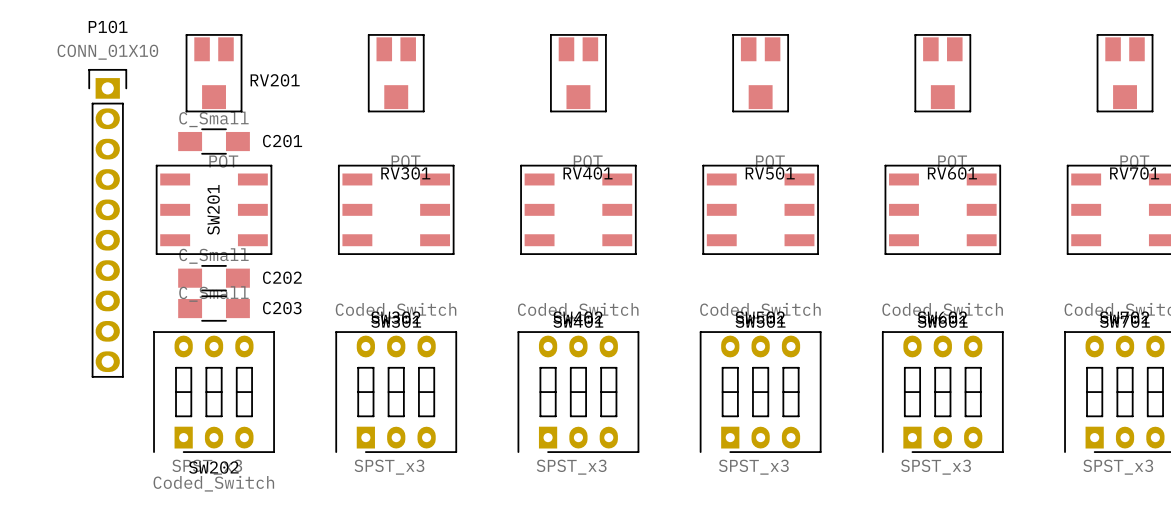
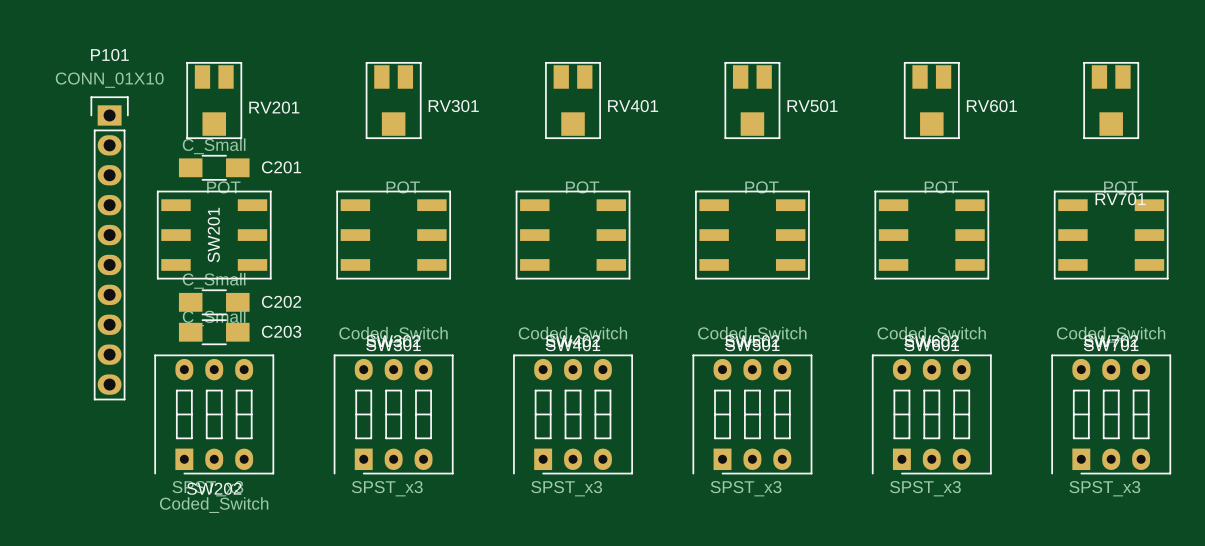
RV301 name position: RV301 (405, 173) -> RV301 (453, 106)
RV401 name position: RV401 (588, 173) -> RV401 (633, 106)
RV501 name position: RV501 (770, 173) -> RV501 (812, 106)
RV601 name position: RV601 (952, 173) -> RV601 (991, 106)

